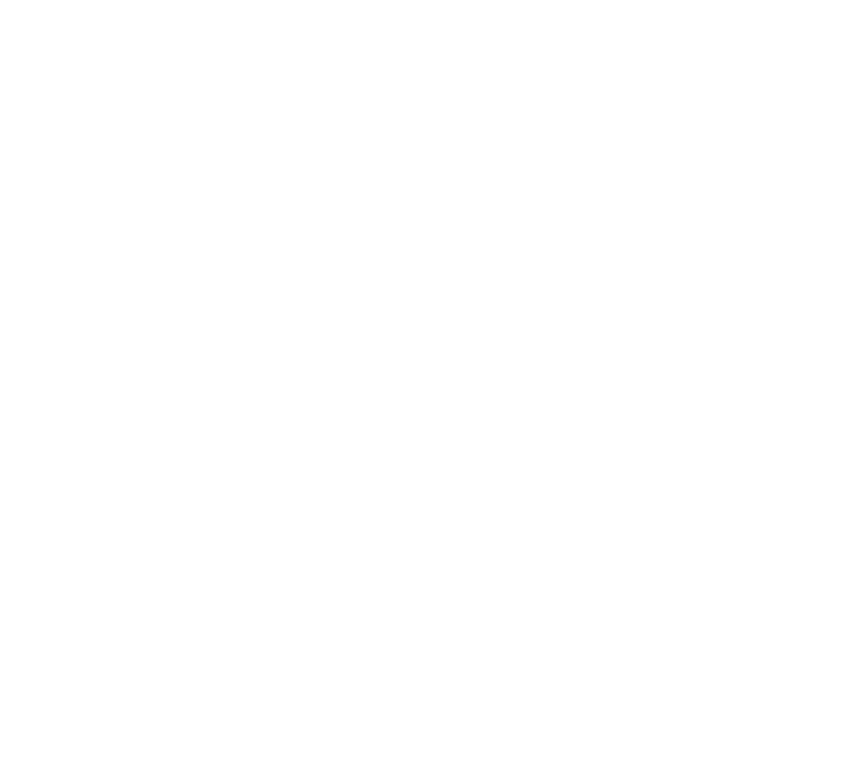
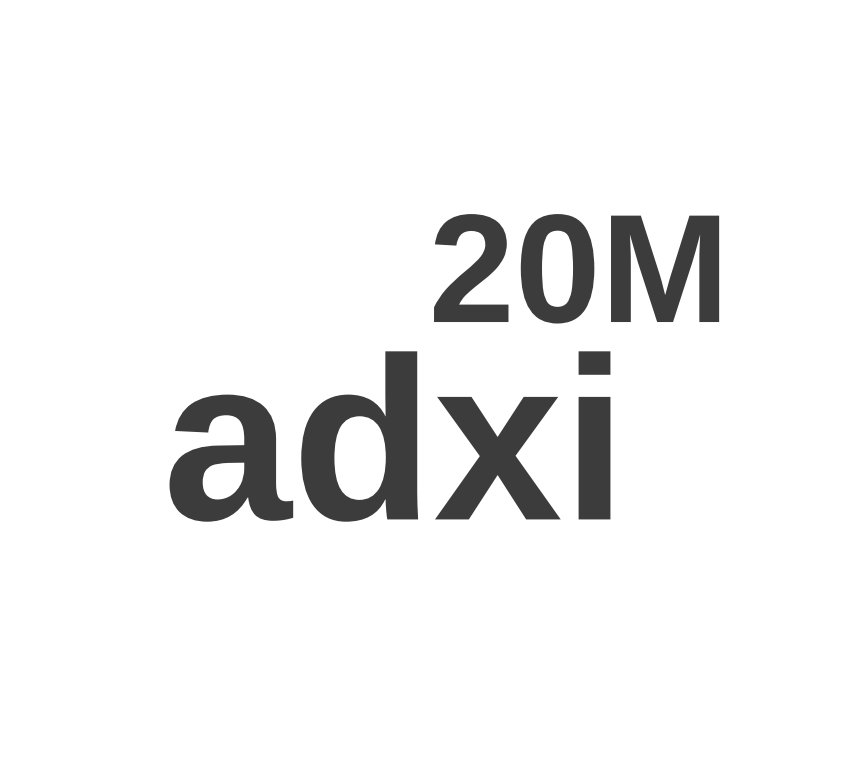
text: none -> 20M (576, 268)
text: none -> adxi (389, 436)

